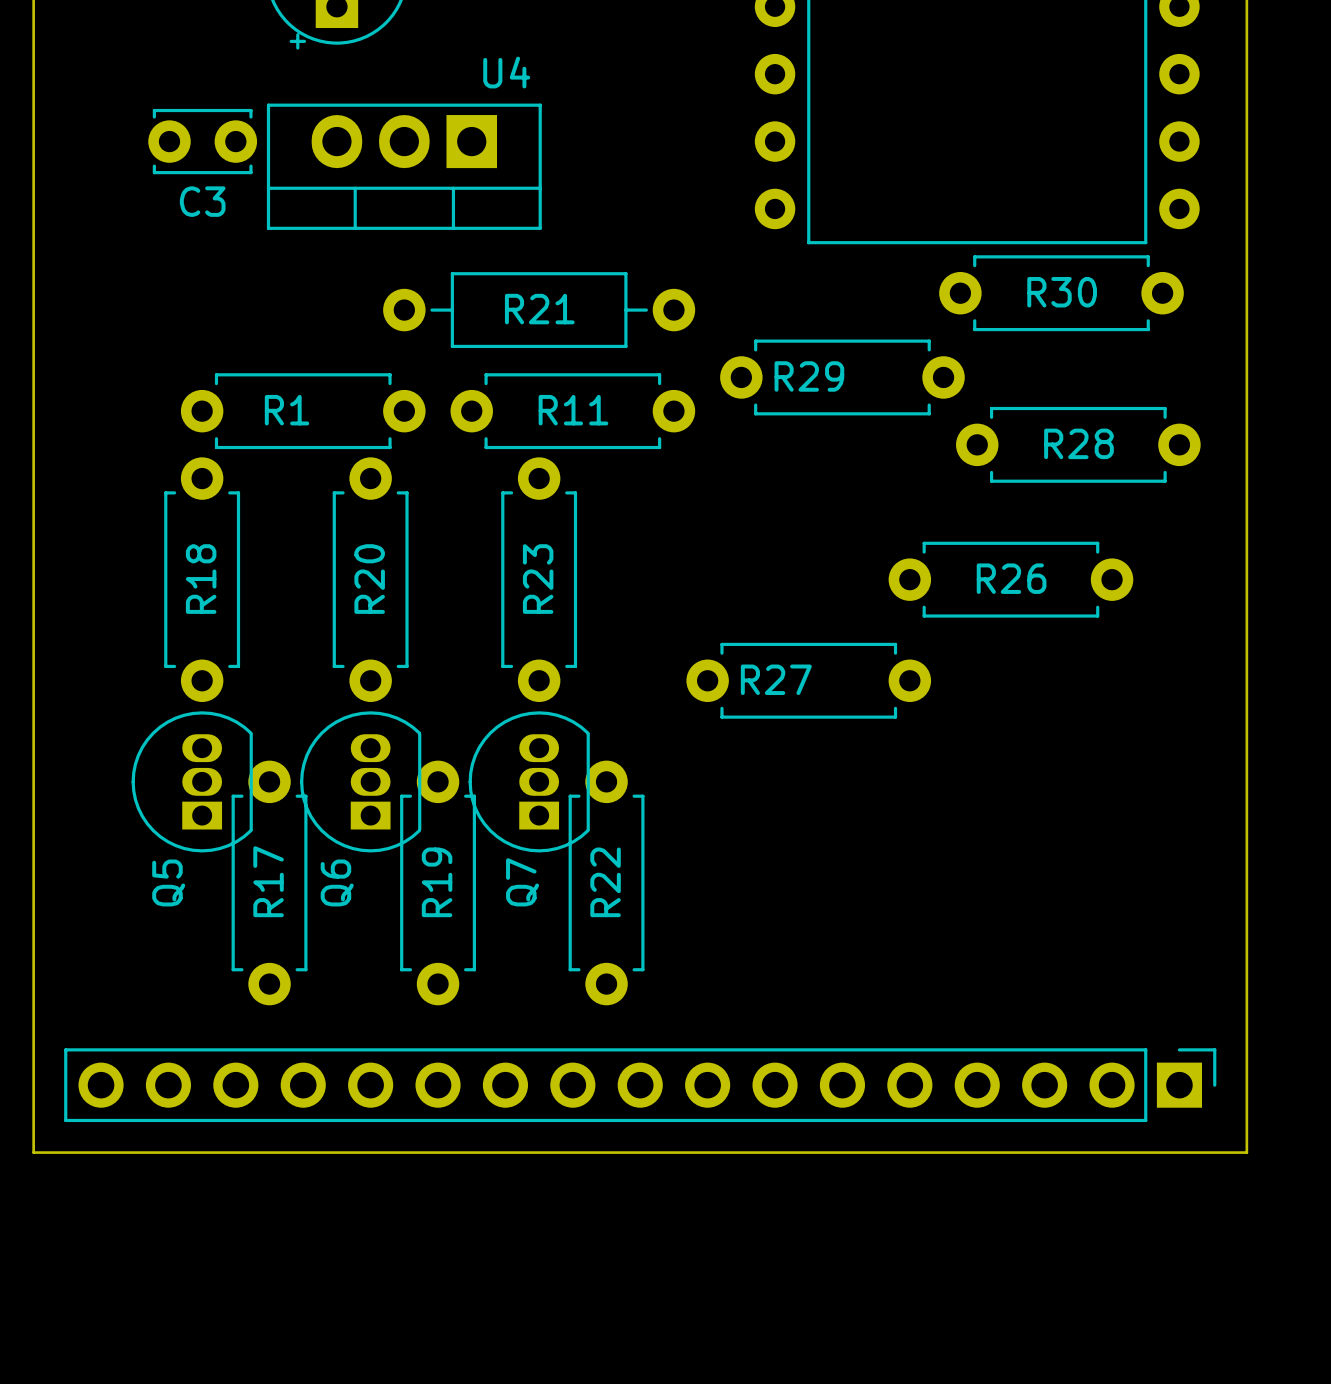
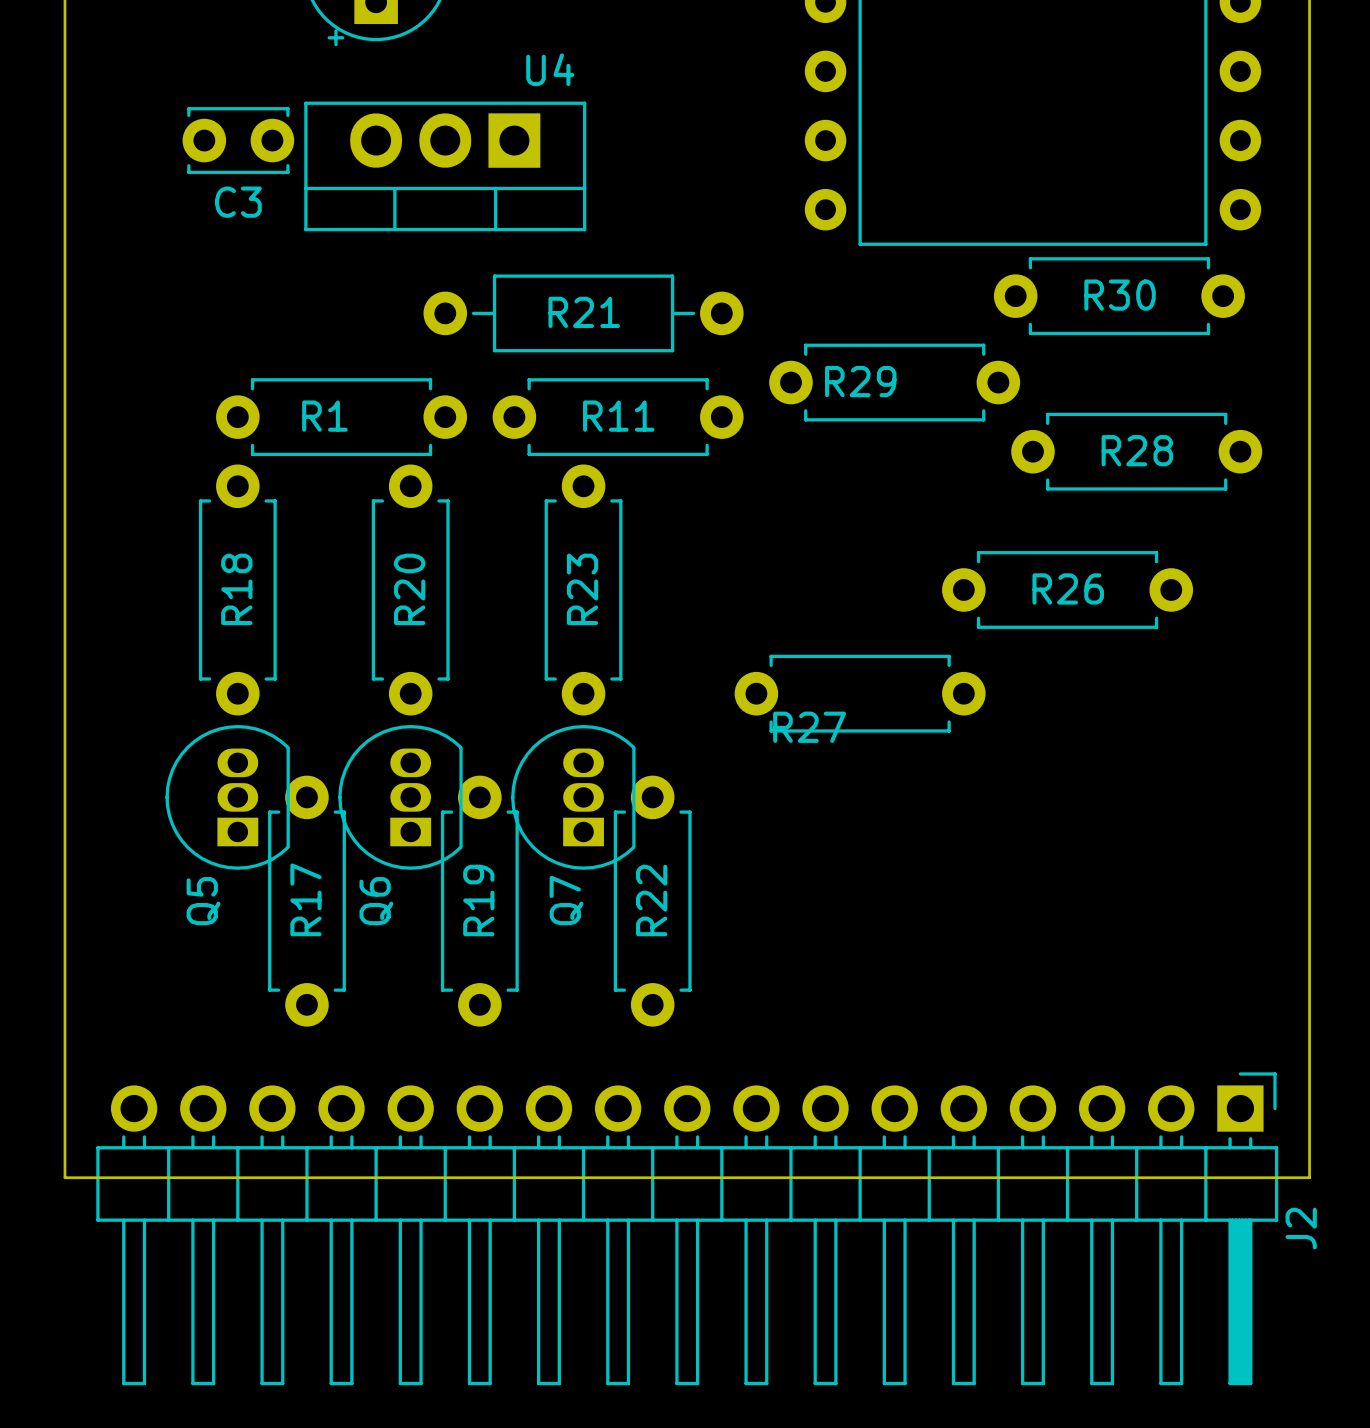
R27 name position: R27 (776, 679) -> R27 (809, 727)
part: (640, 1085) -> none
J2: none -> (687, 1228)

